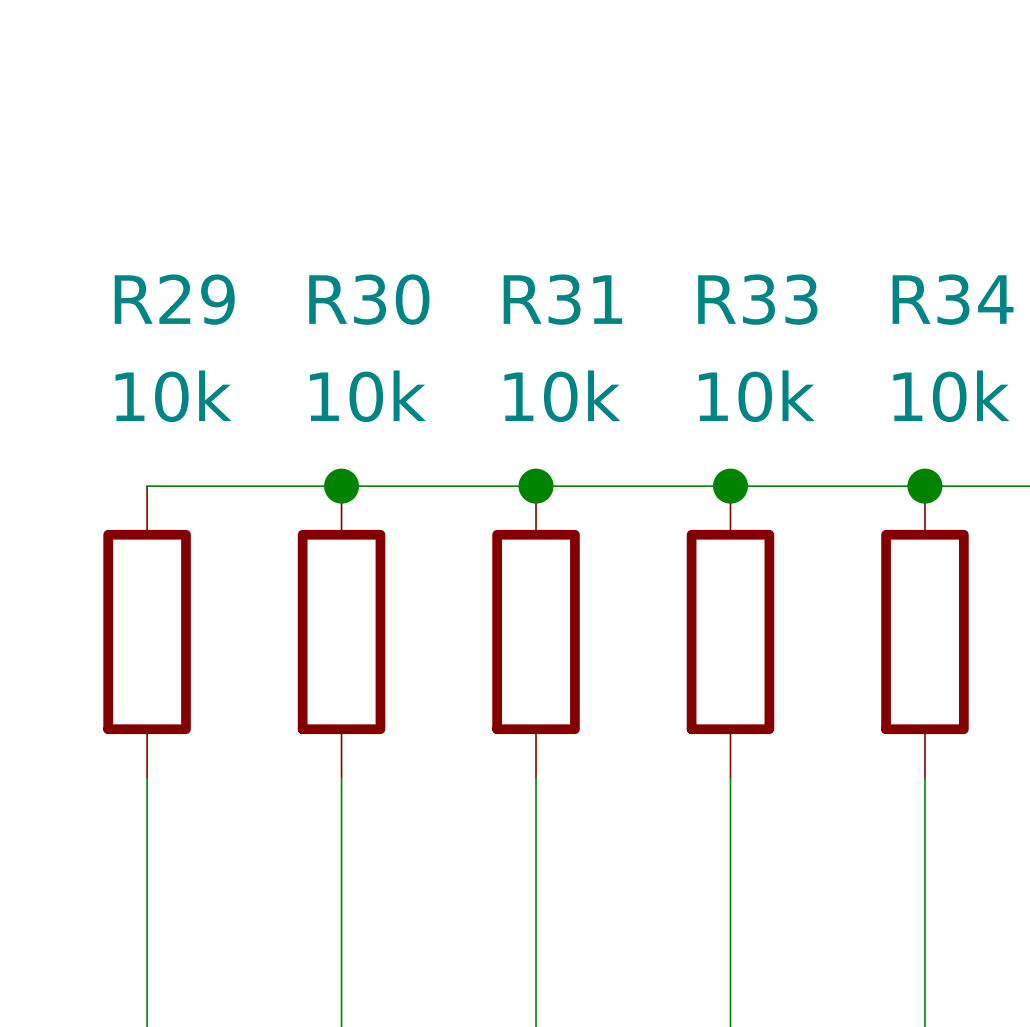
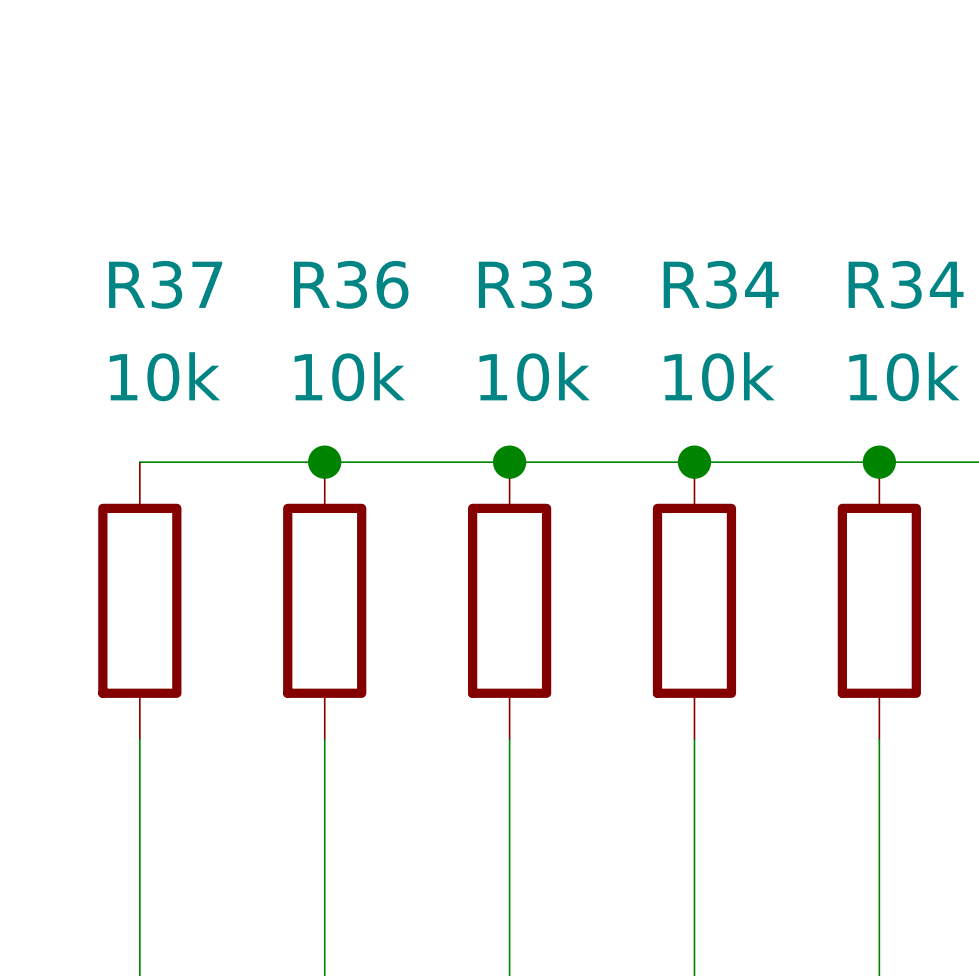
R29 name: R29 (174, 299) -> R37 (165, 284)
R30 name: R30 (369, 299) -> R36 (351, 284)
R31 name: R31 (562, 299) -> R33 (535, 284)
R33 name: R33 (757, 299) -> R34 (721, 284)

